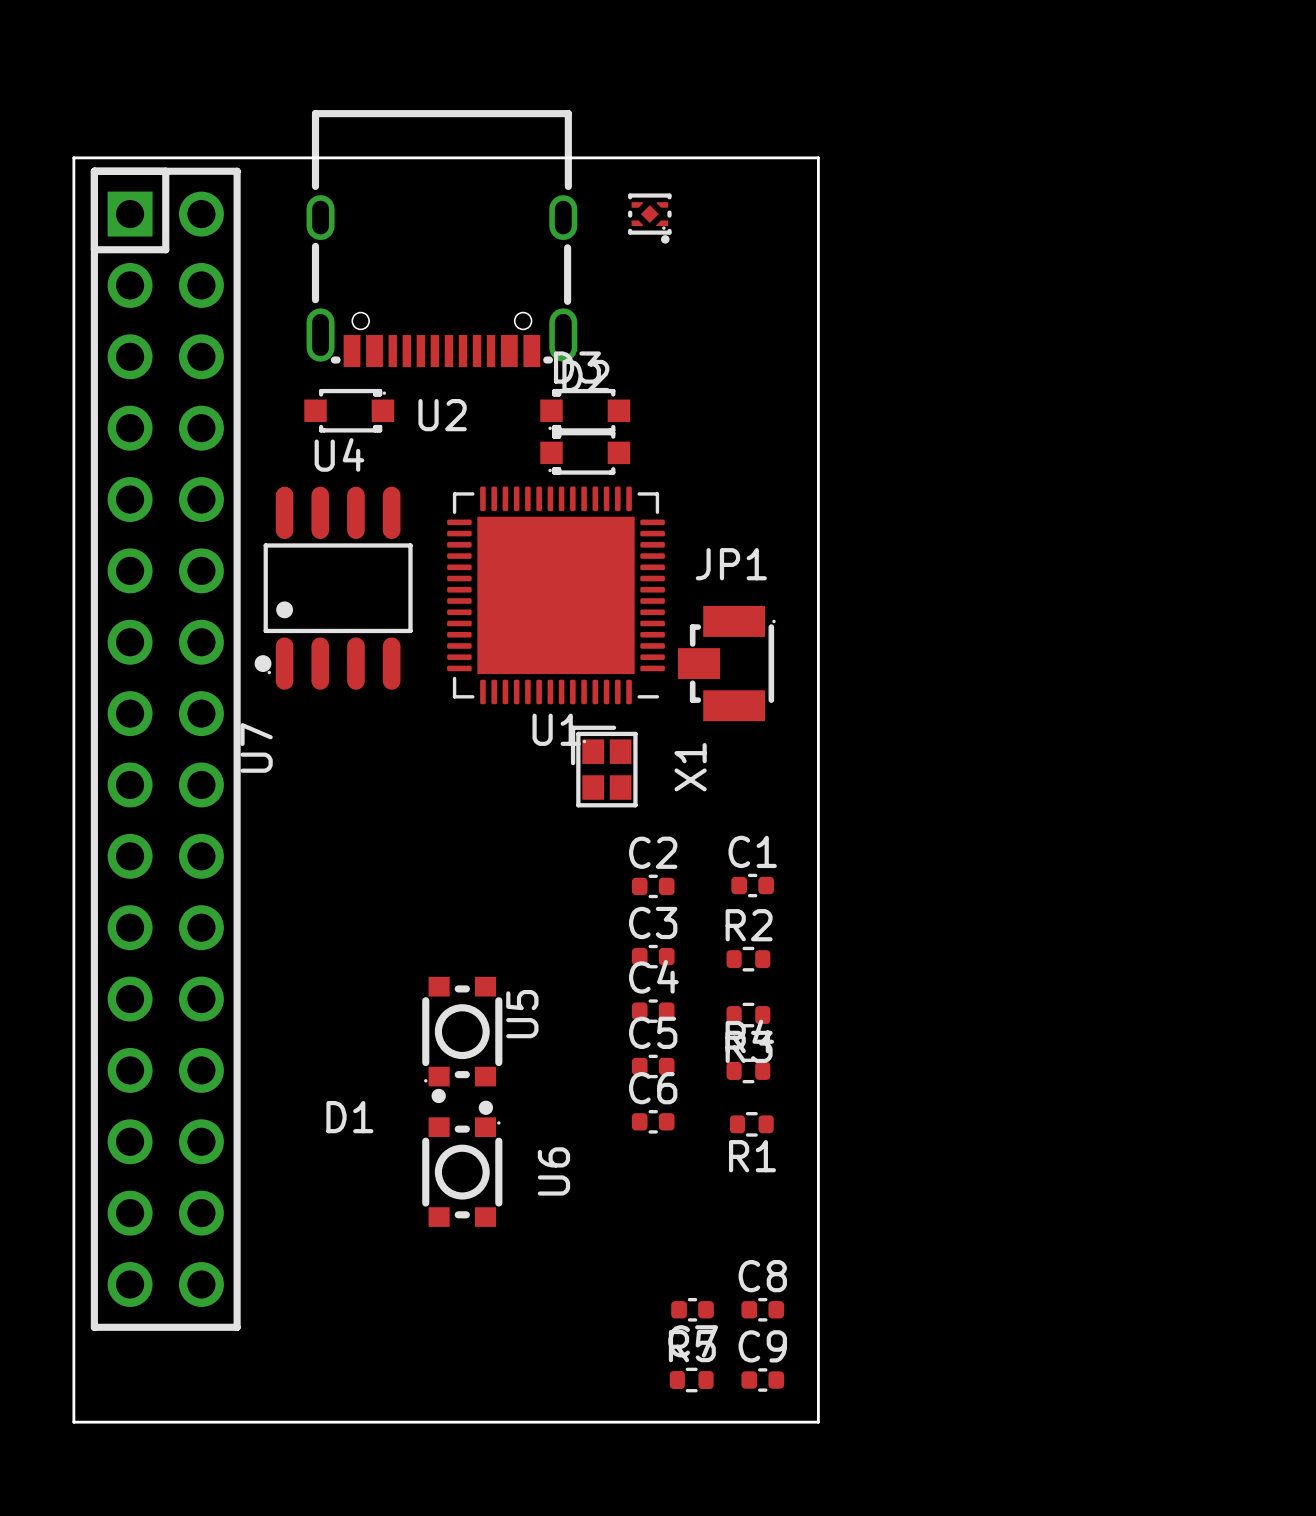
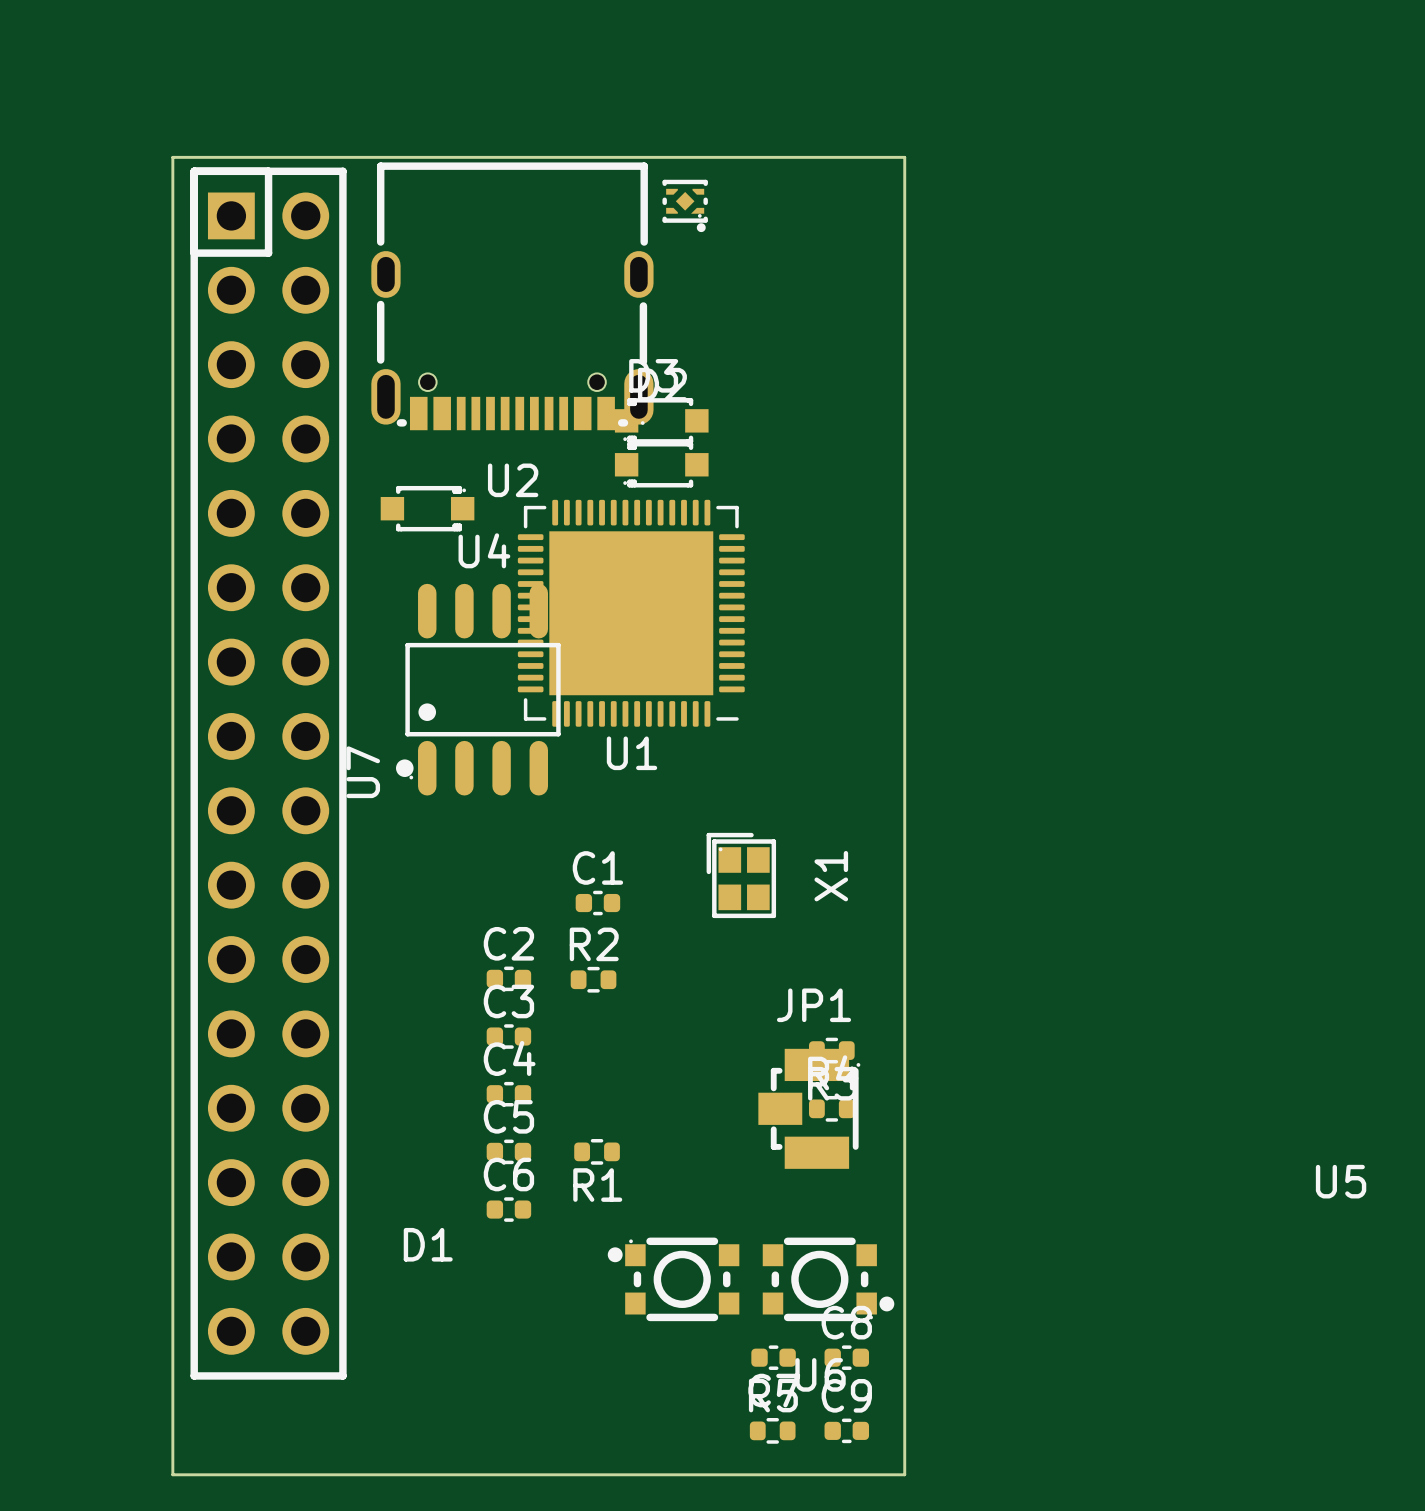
board edge: (116, 157) (73, 157) (73, 1422) (116, 1422) -> (172, 157) (172, 1474)
part position: (649, 218) -> (685, 205)
U2 position: (441, 238) -> (512, 296)
D1 position: (349, 410) -> (427, 508)
U4 position: (333, 588) -> (478, 689)
JP1 position: (726, 663) -> (809, 1108)
U7 position: (165, 749) -> (268, 773)
X1 position: (604, 766) -> (741, 875)
C1 position: (752, 885) -> (597, 903)
C2 position: (653, 886) -> (508, 978)
C3 position: (653, 956) -> (508, 1036)
R2 position: (748, 959) -> (593, 979)
C4 position: (653, 1011) -> (508, 1094)
U5 name position: U5 (522, 1014) -> U5 (1341, 1181)
U5 rotation: 0° (462, 1039) -> 90° clockwise (673, 1279)
U5 position: (462, 1039) -> (673, 1279)
C5 position: (653, 1066) -> (508, 1151)
C6 position: (653, 1121) -> (508, 1209)
R1 position: (751, 1124) -> (597, 1151)
U6 rotation: 0° (462, 1163) -> 90° clockwise (828, 1279)
U6 position: (462, 1163) -> (828, 1279)

